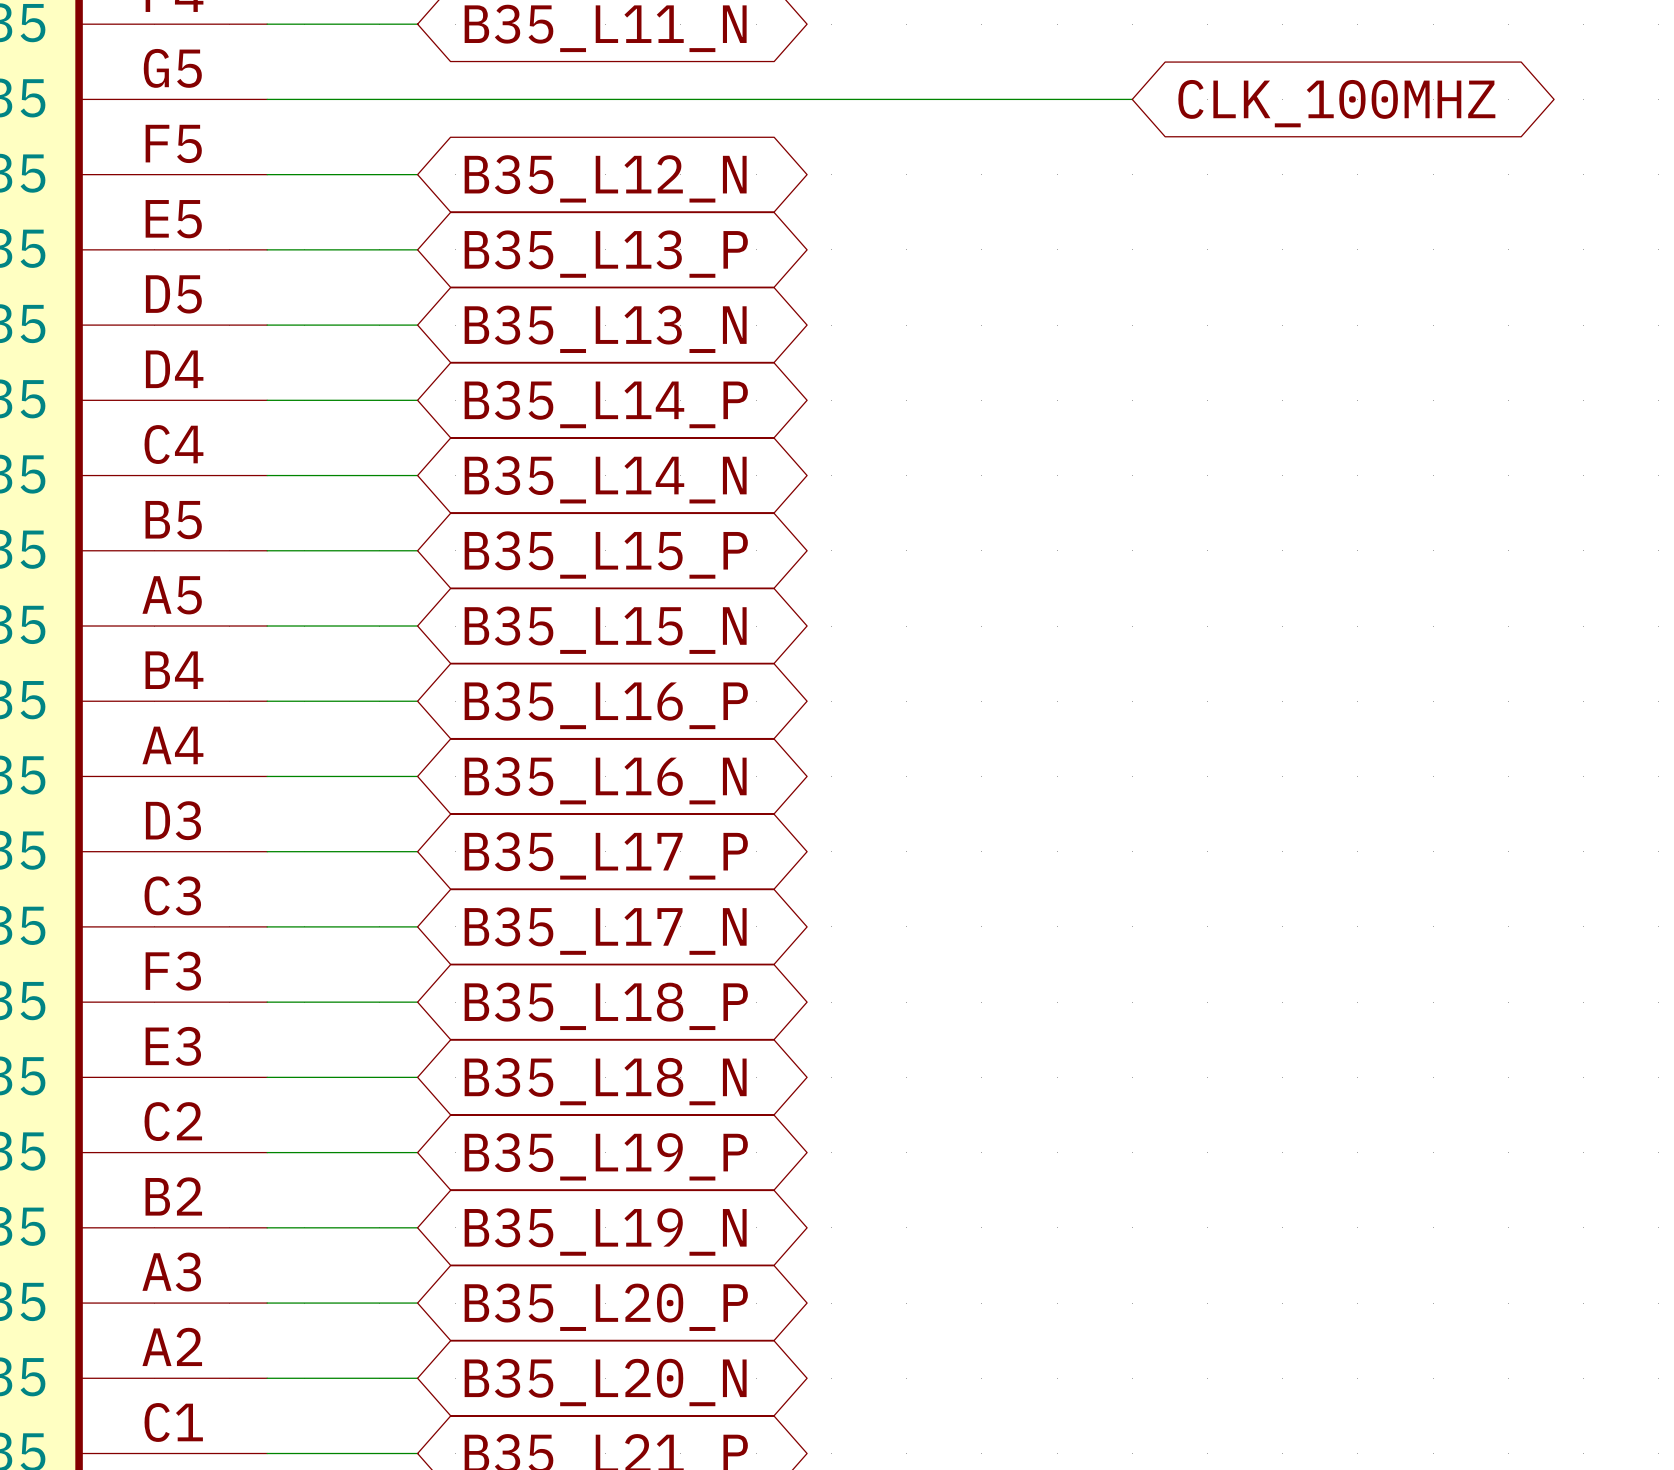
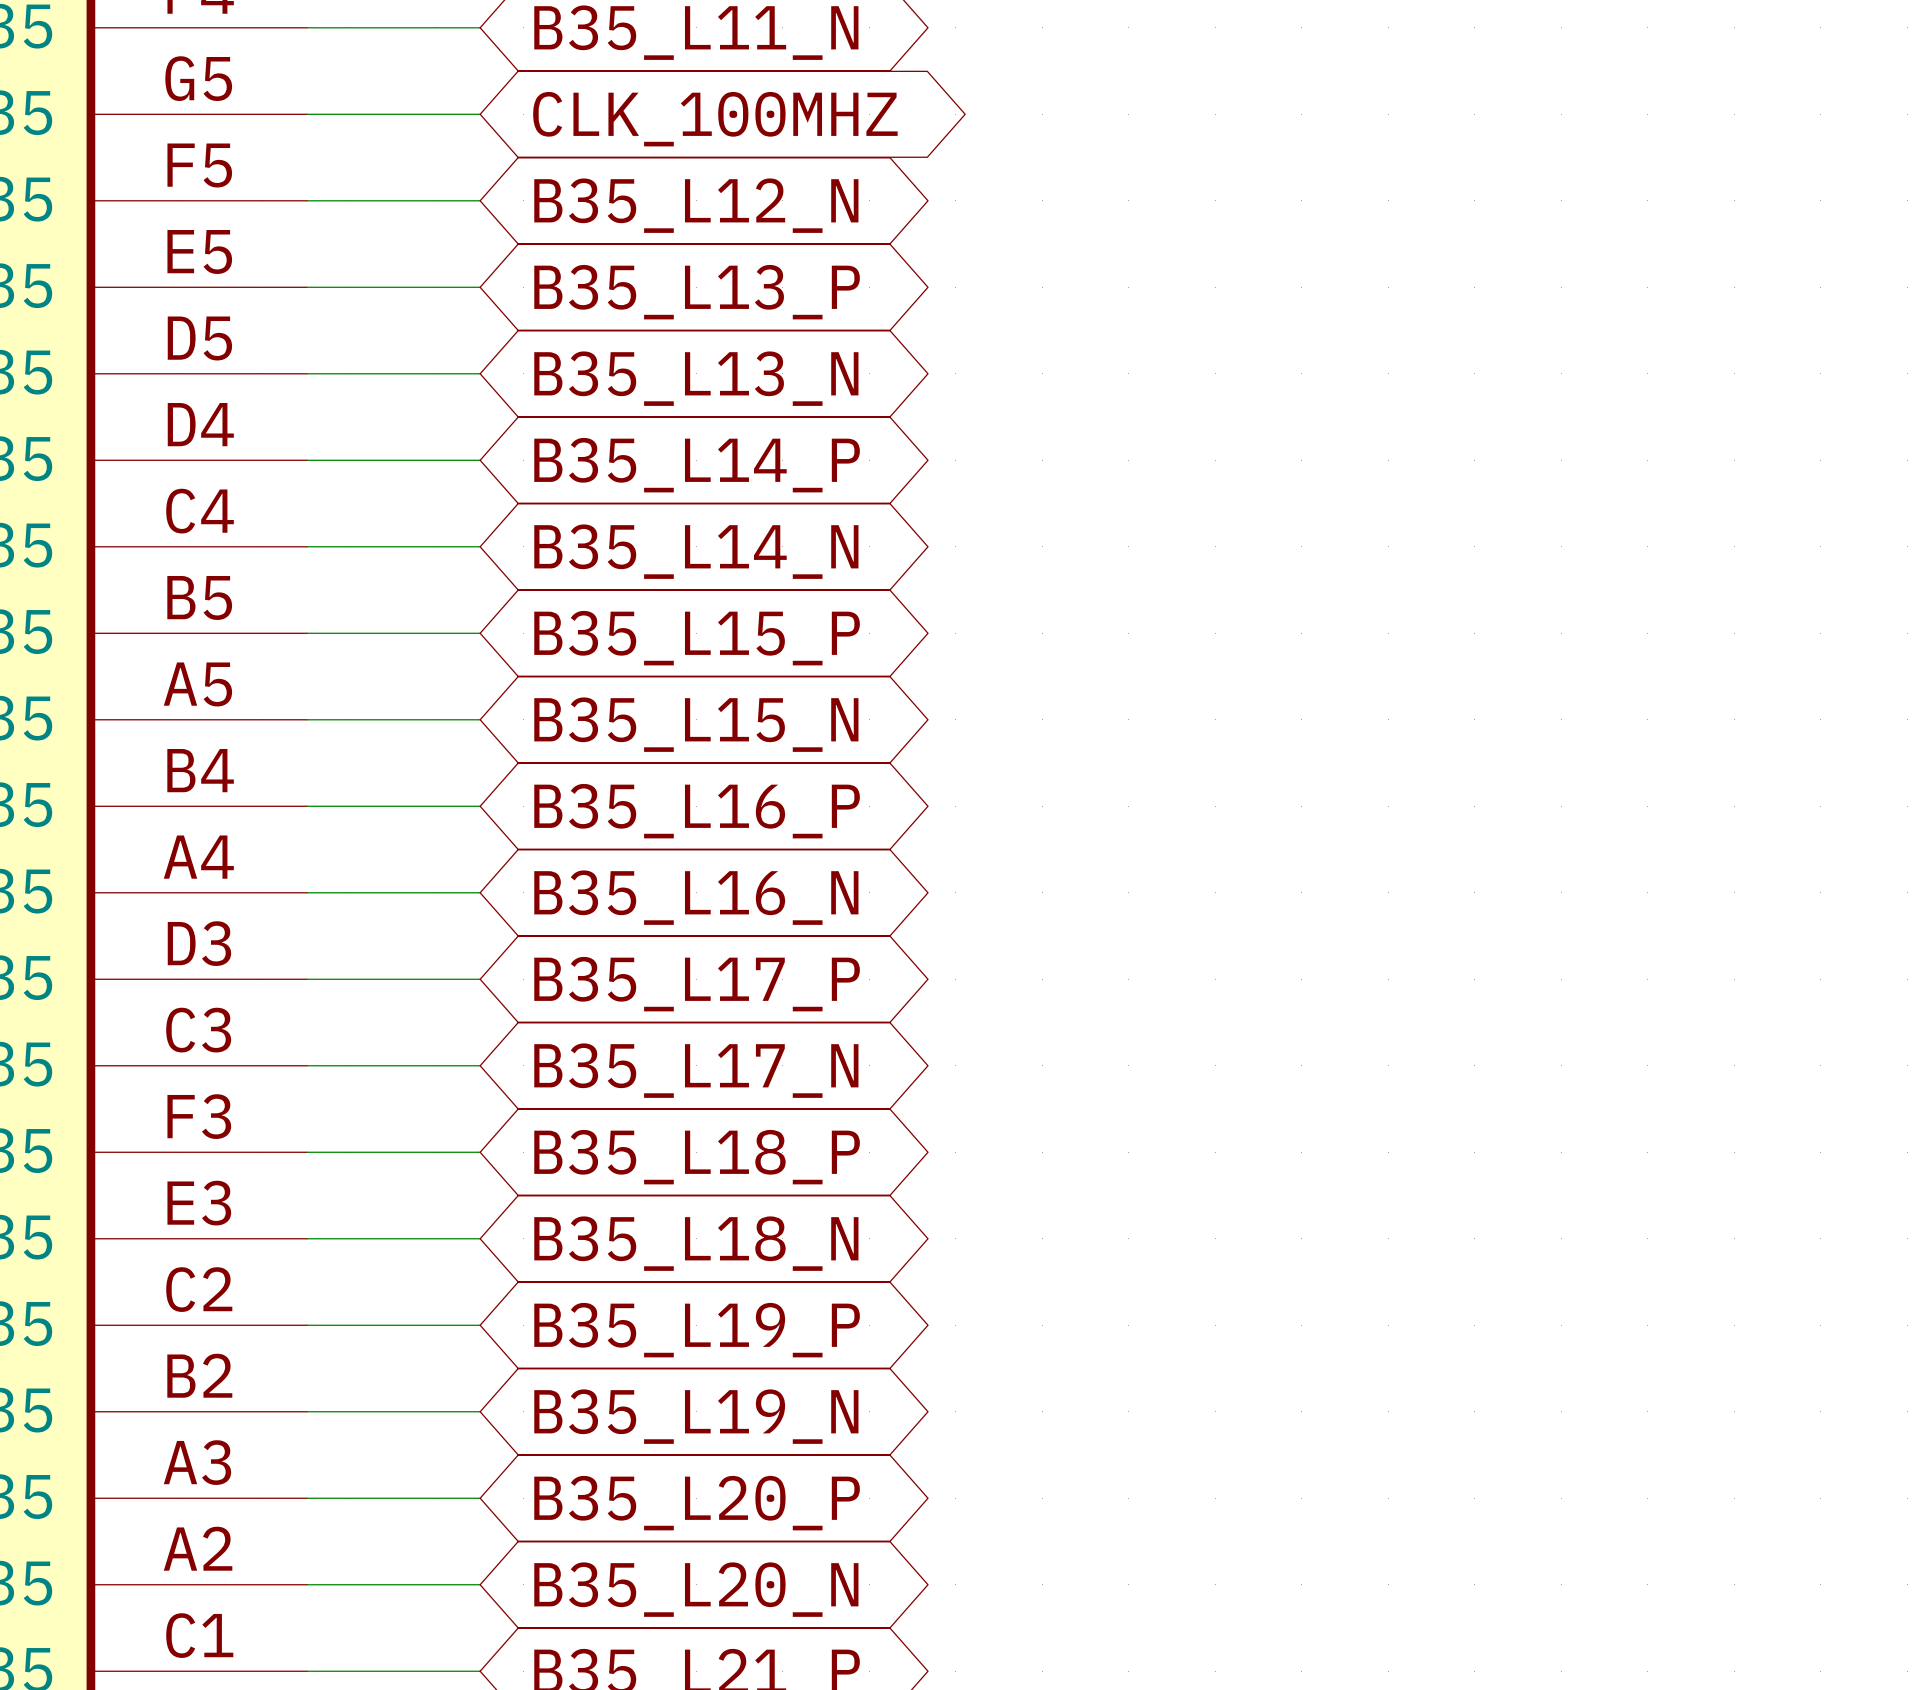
wire: (417, 99) (1132, 99) -> none
global label position: CLK_100MHZ (1336, 103) -> CLK_100MHZ (715, 119)

